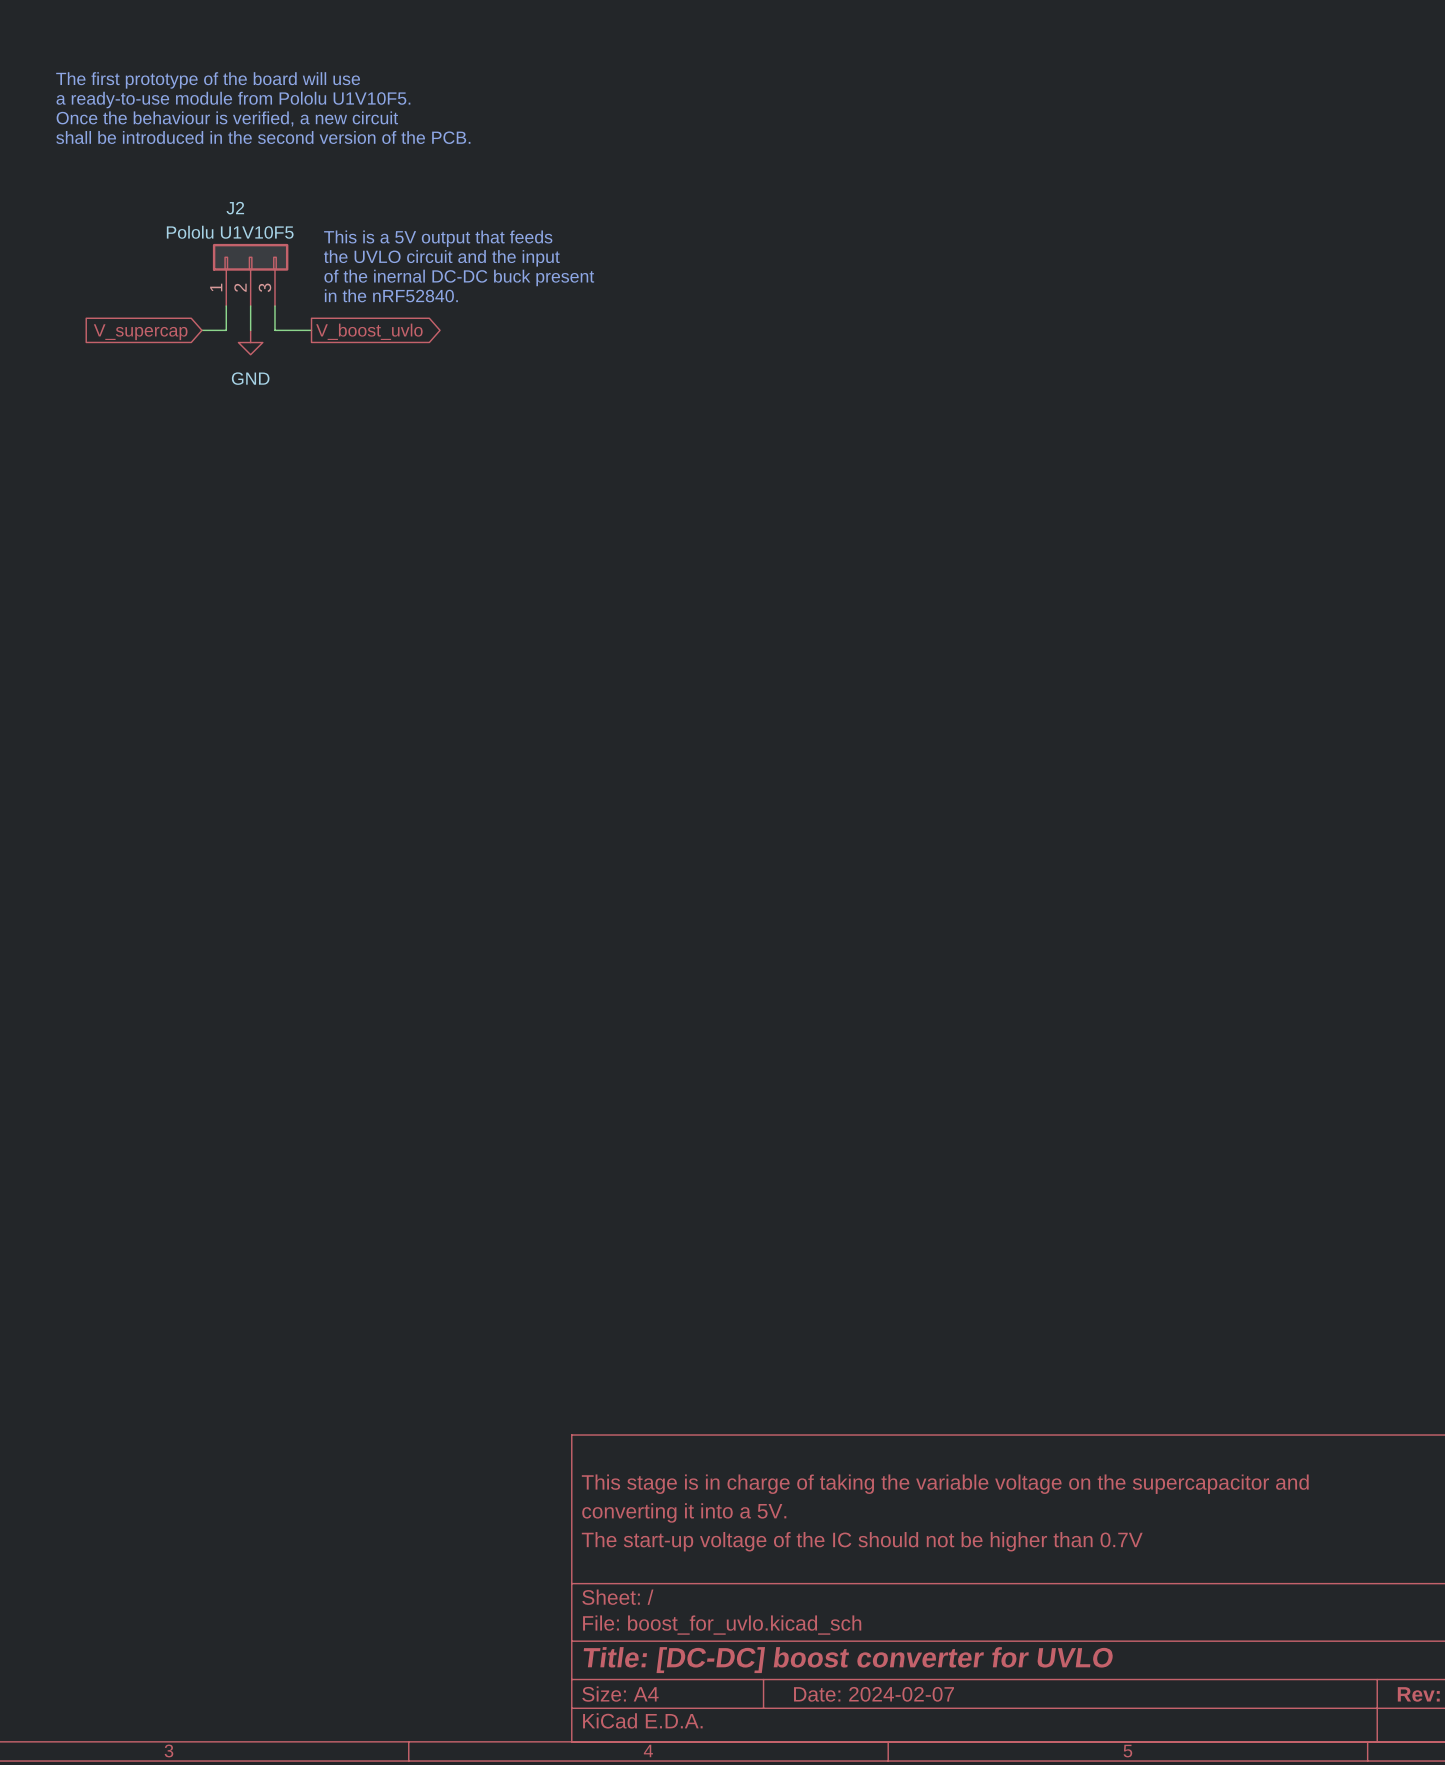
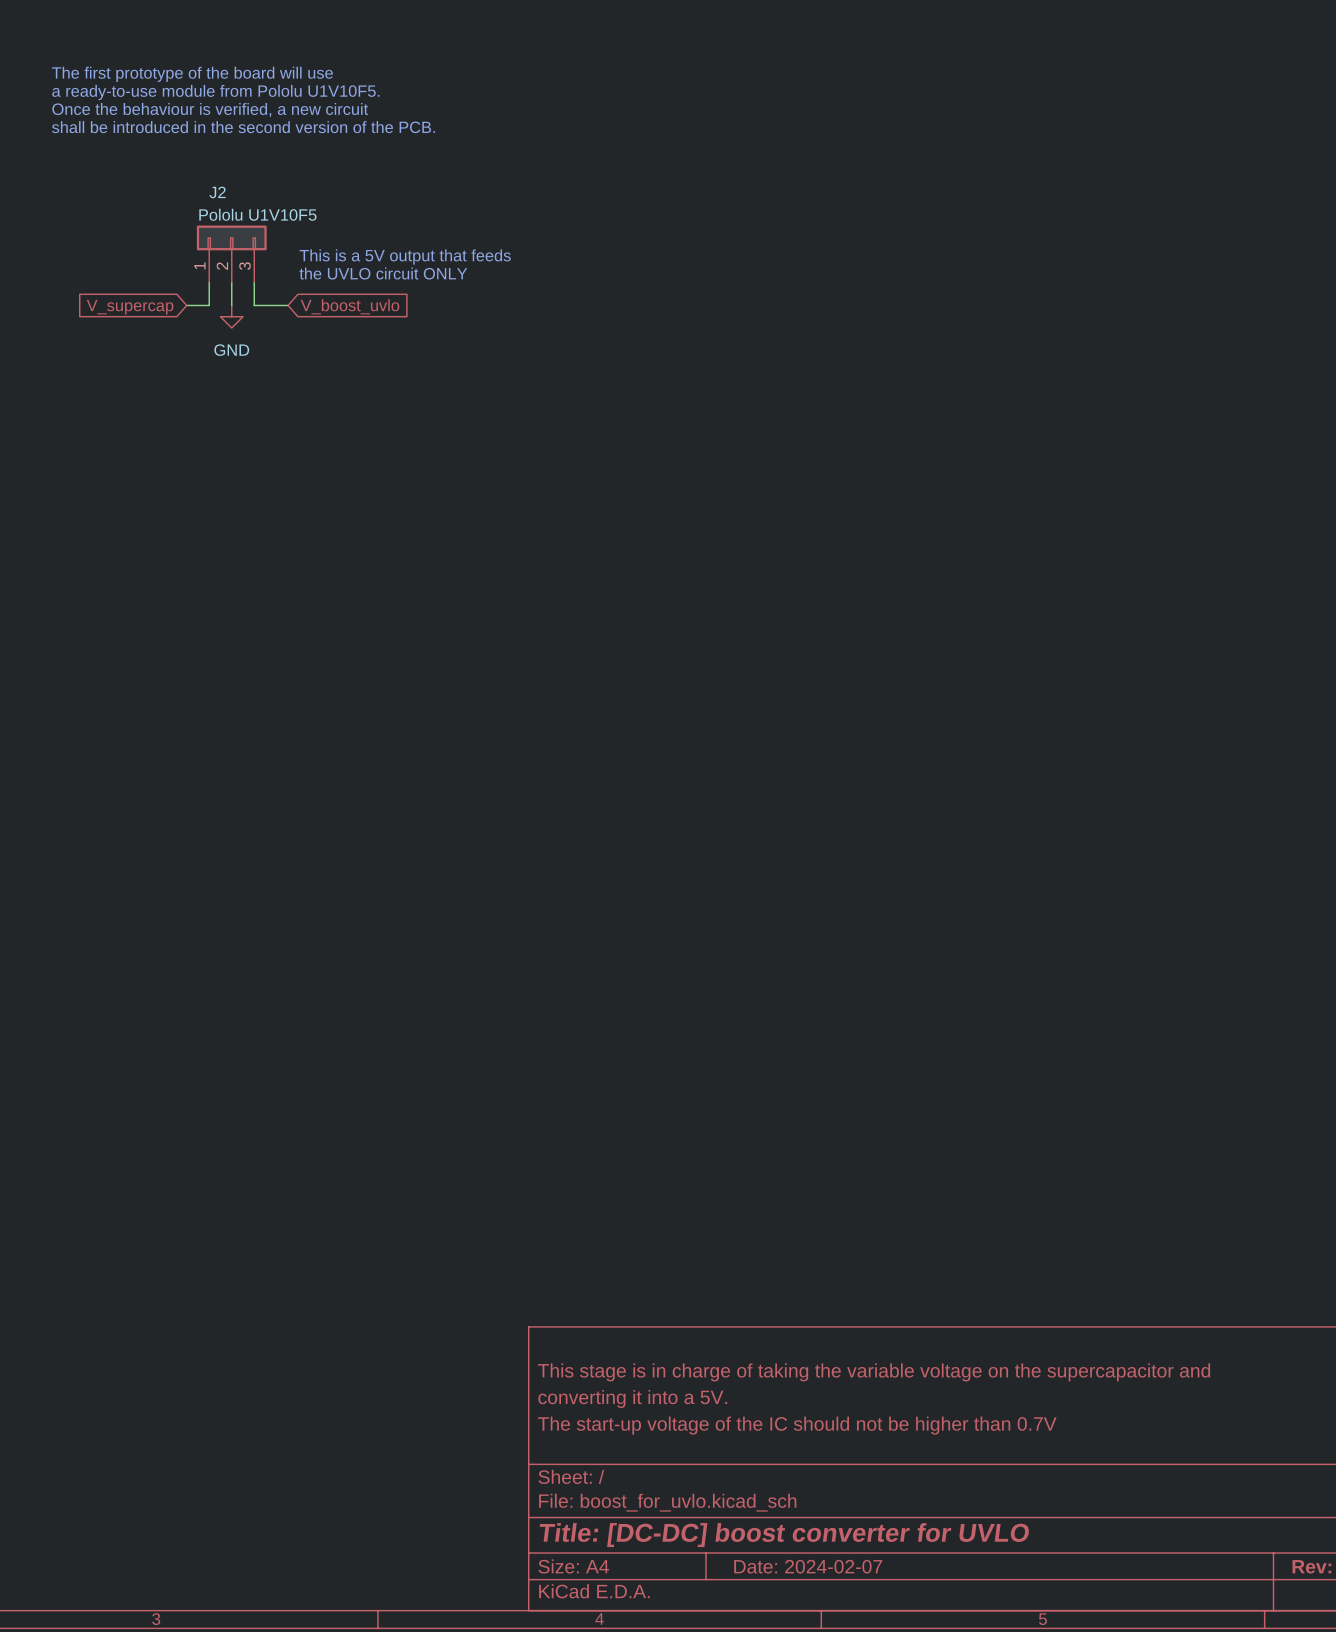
J2 value position: Pololu U1V10F5 (230, 232) -> Pololu U1V10F5 (257, 214)
text: This is a 5V output that feeds (438, 238) -> none
text: the UVLO circuit and the input (441, 258) -> none
text: of the inernal DC-DC buck present (459, 277) -> This is a 5V output that feeds (405, 257)
text: in the nRF52840. (391, 295) -> the UVLO circuit ONLY (383, 273)
global label shape: output (369, 331) -> input (350, 306)

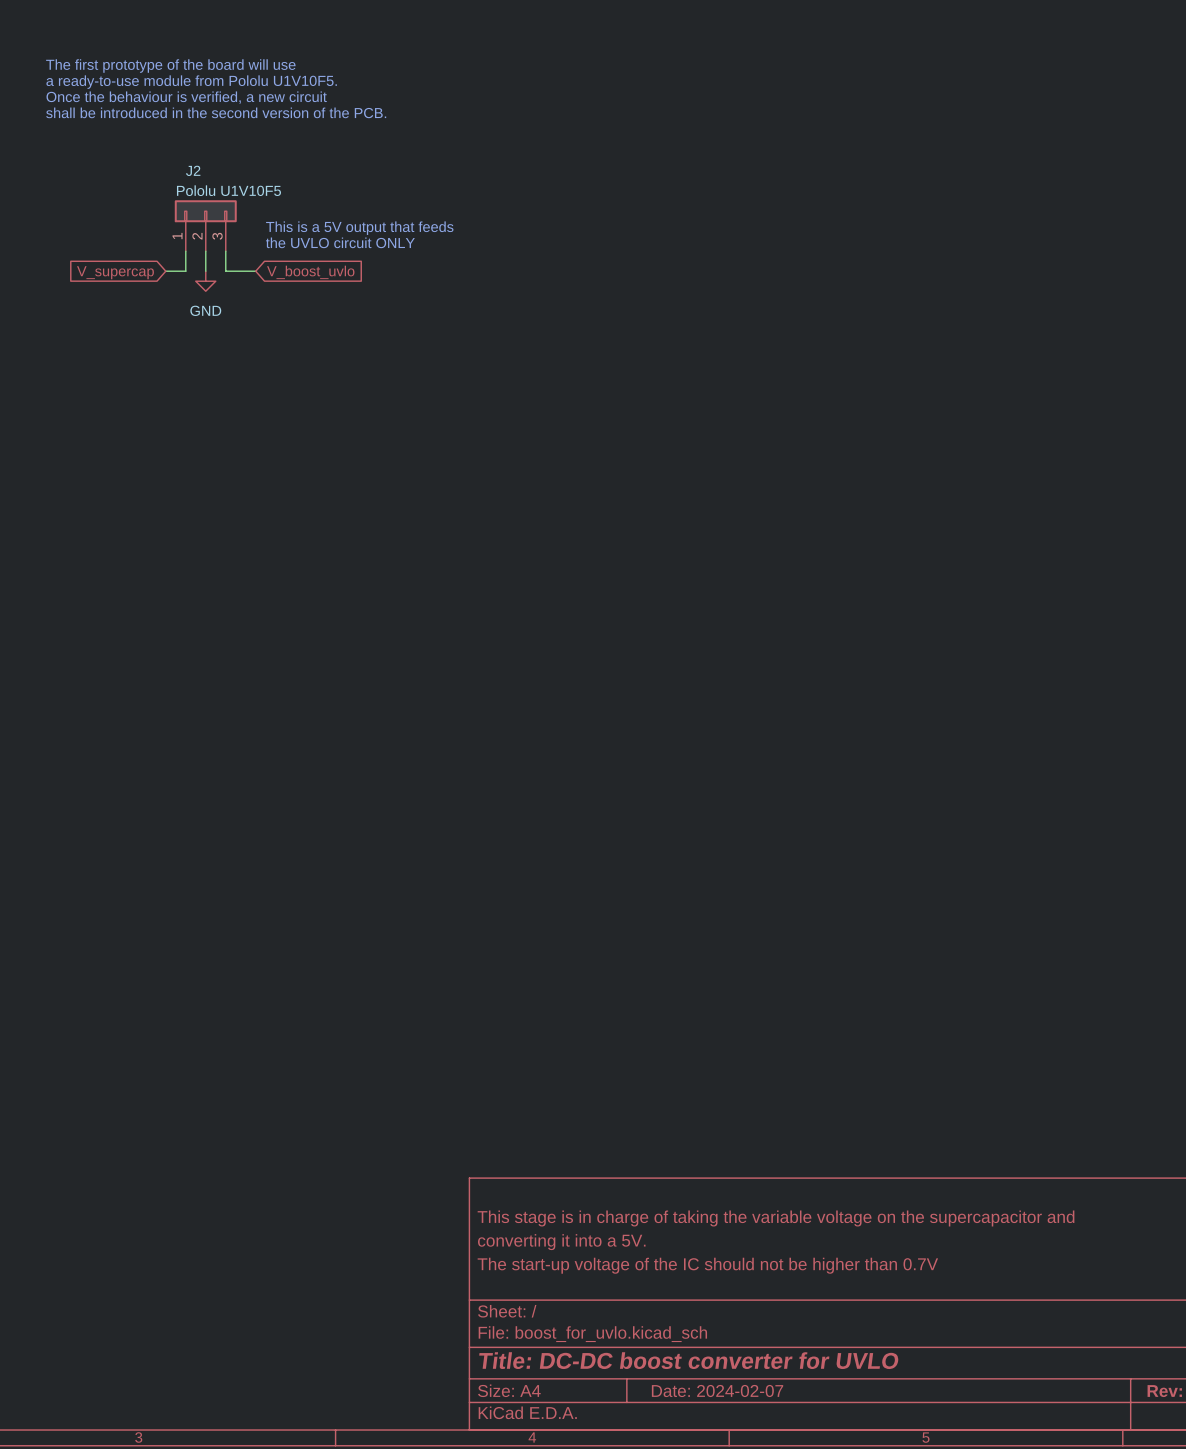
title block: Title: [DC-DC] boost converter for UVLO (784, 1535) -> Title: DC-DC boost converter for UVLO (688, 1360)

